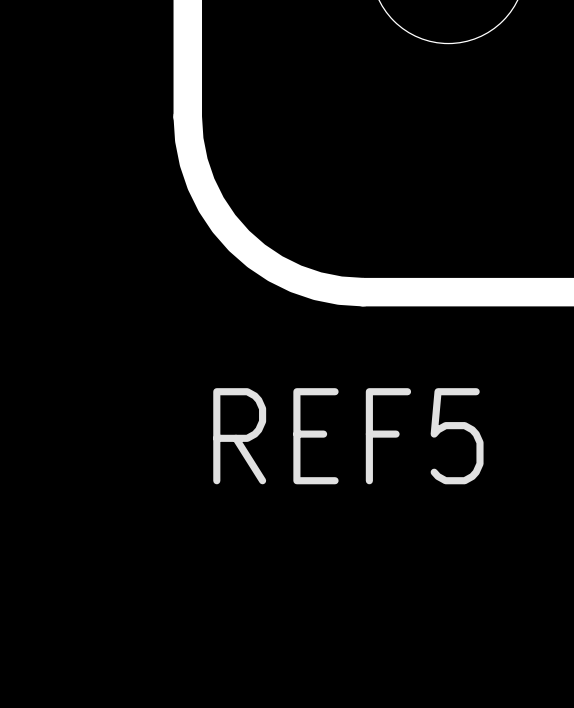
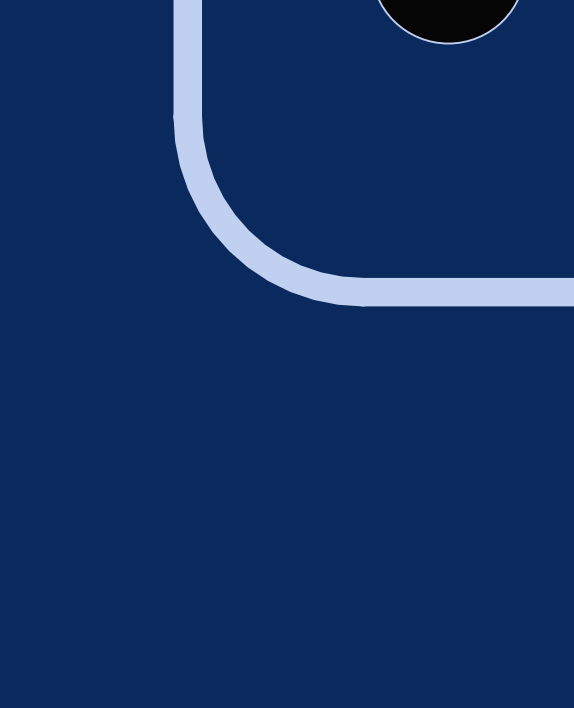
REF5: (348, 436) -> none

